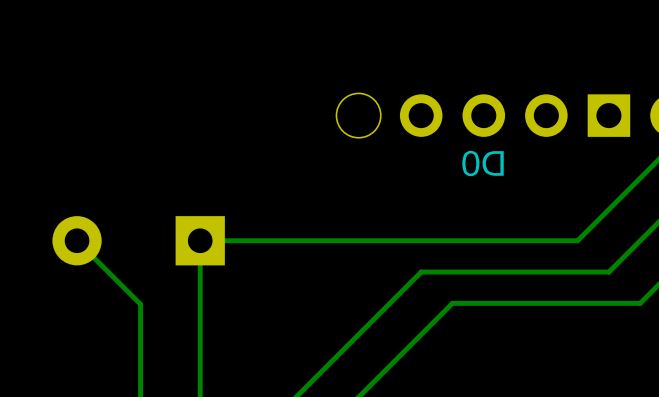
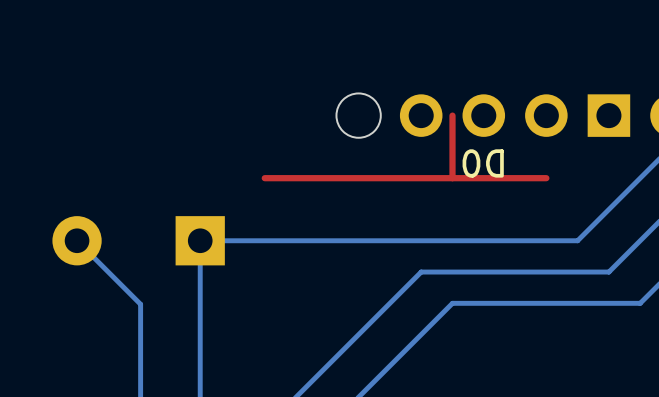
top track: none -> (452, 115) (452, 178)
top track: none -> (546, 178) (264, 178)

